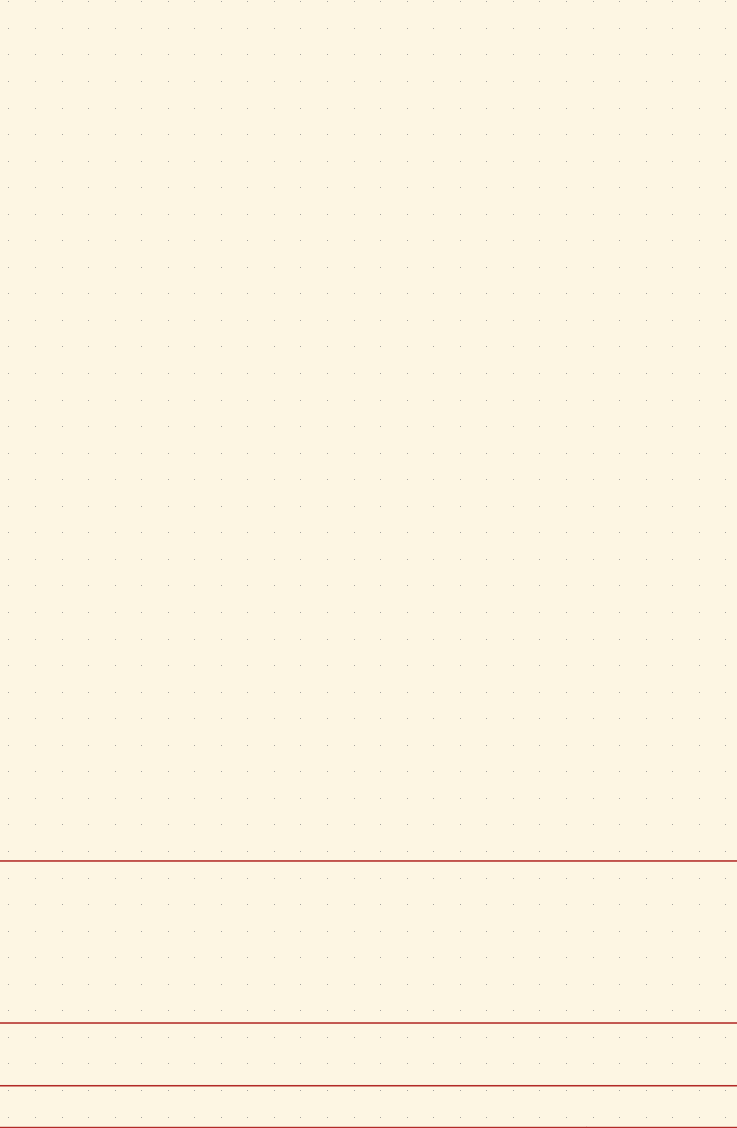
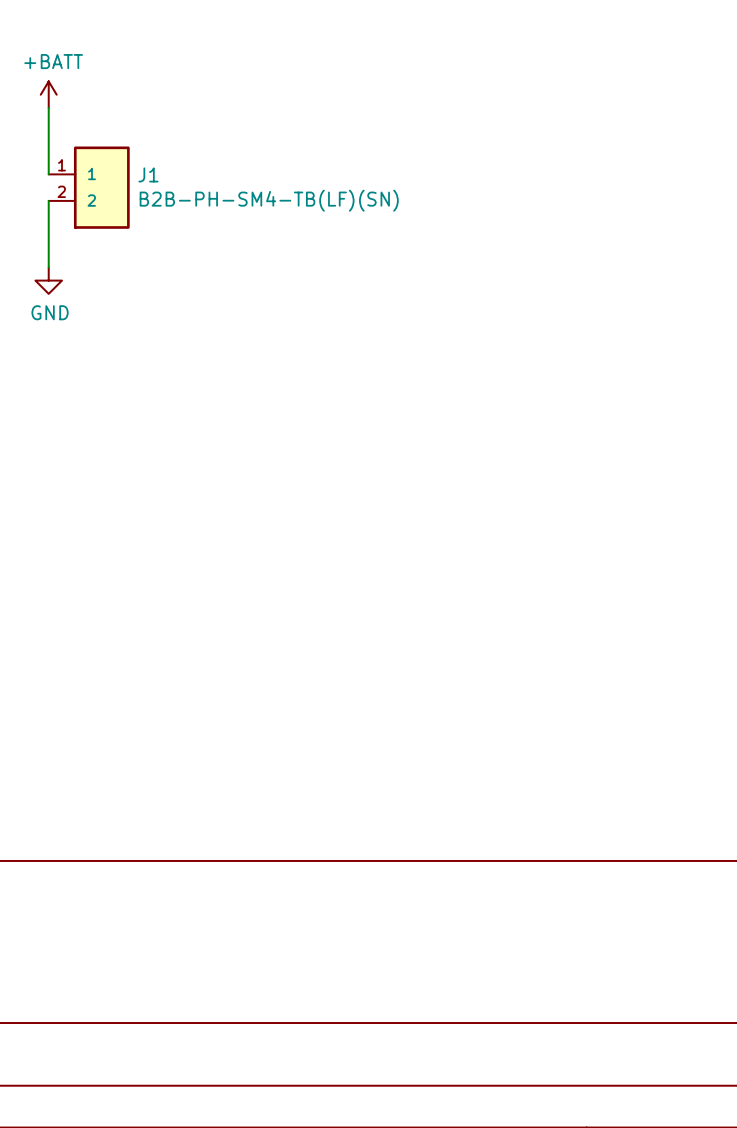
power symbol: none -> +BATT (48, 94)
wire: none -> (48, 108) (48, 174)
J1: none -> B2B-PH-SM4-TB(LF)(SN) (89, 187)
wire: none -> (48, 200) (48, 267)
power symbol: none -> GND (48, 280)

